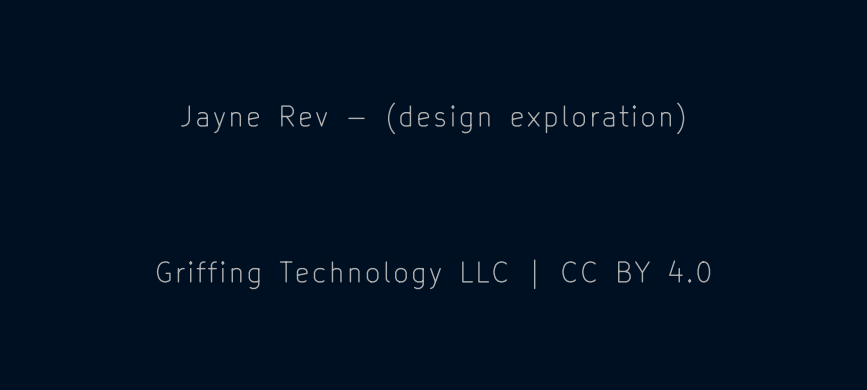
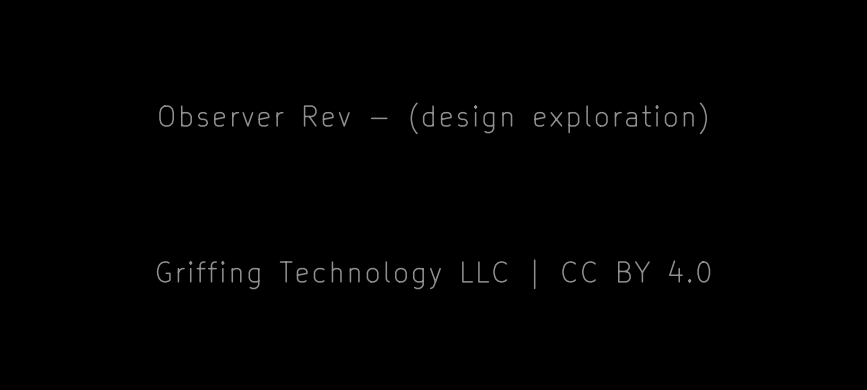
text: Jayne Rev - (design exploration) (432, 118) -> Observer Rev - (design exploration) (433, 118)

